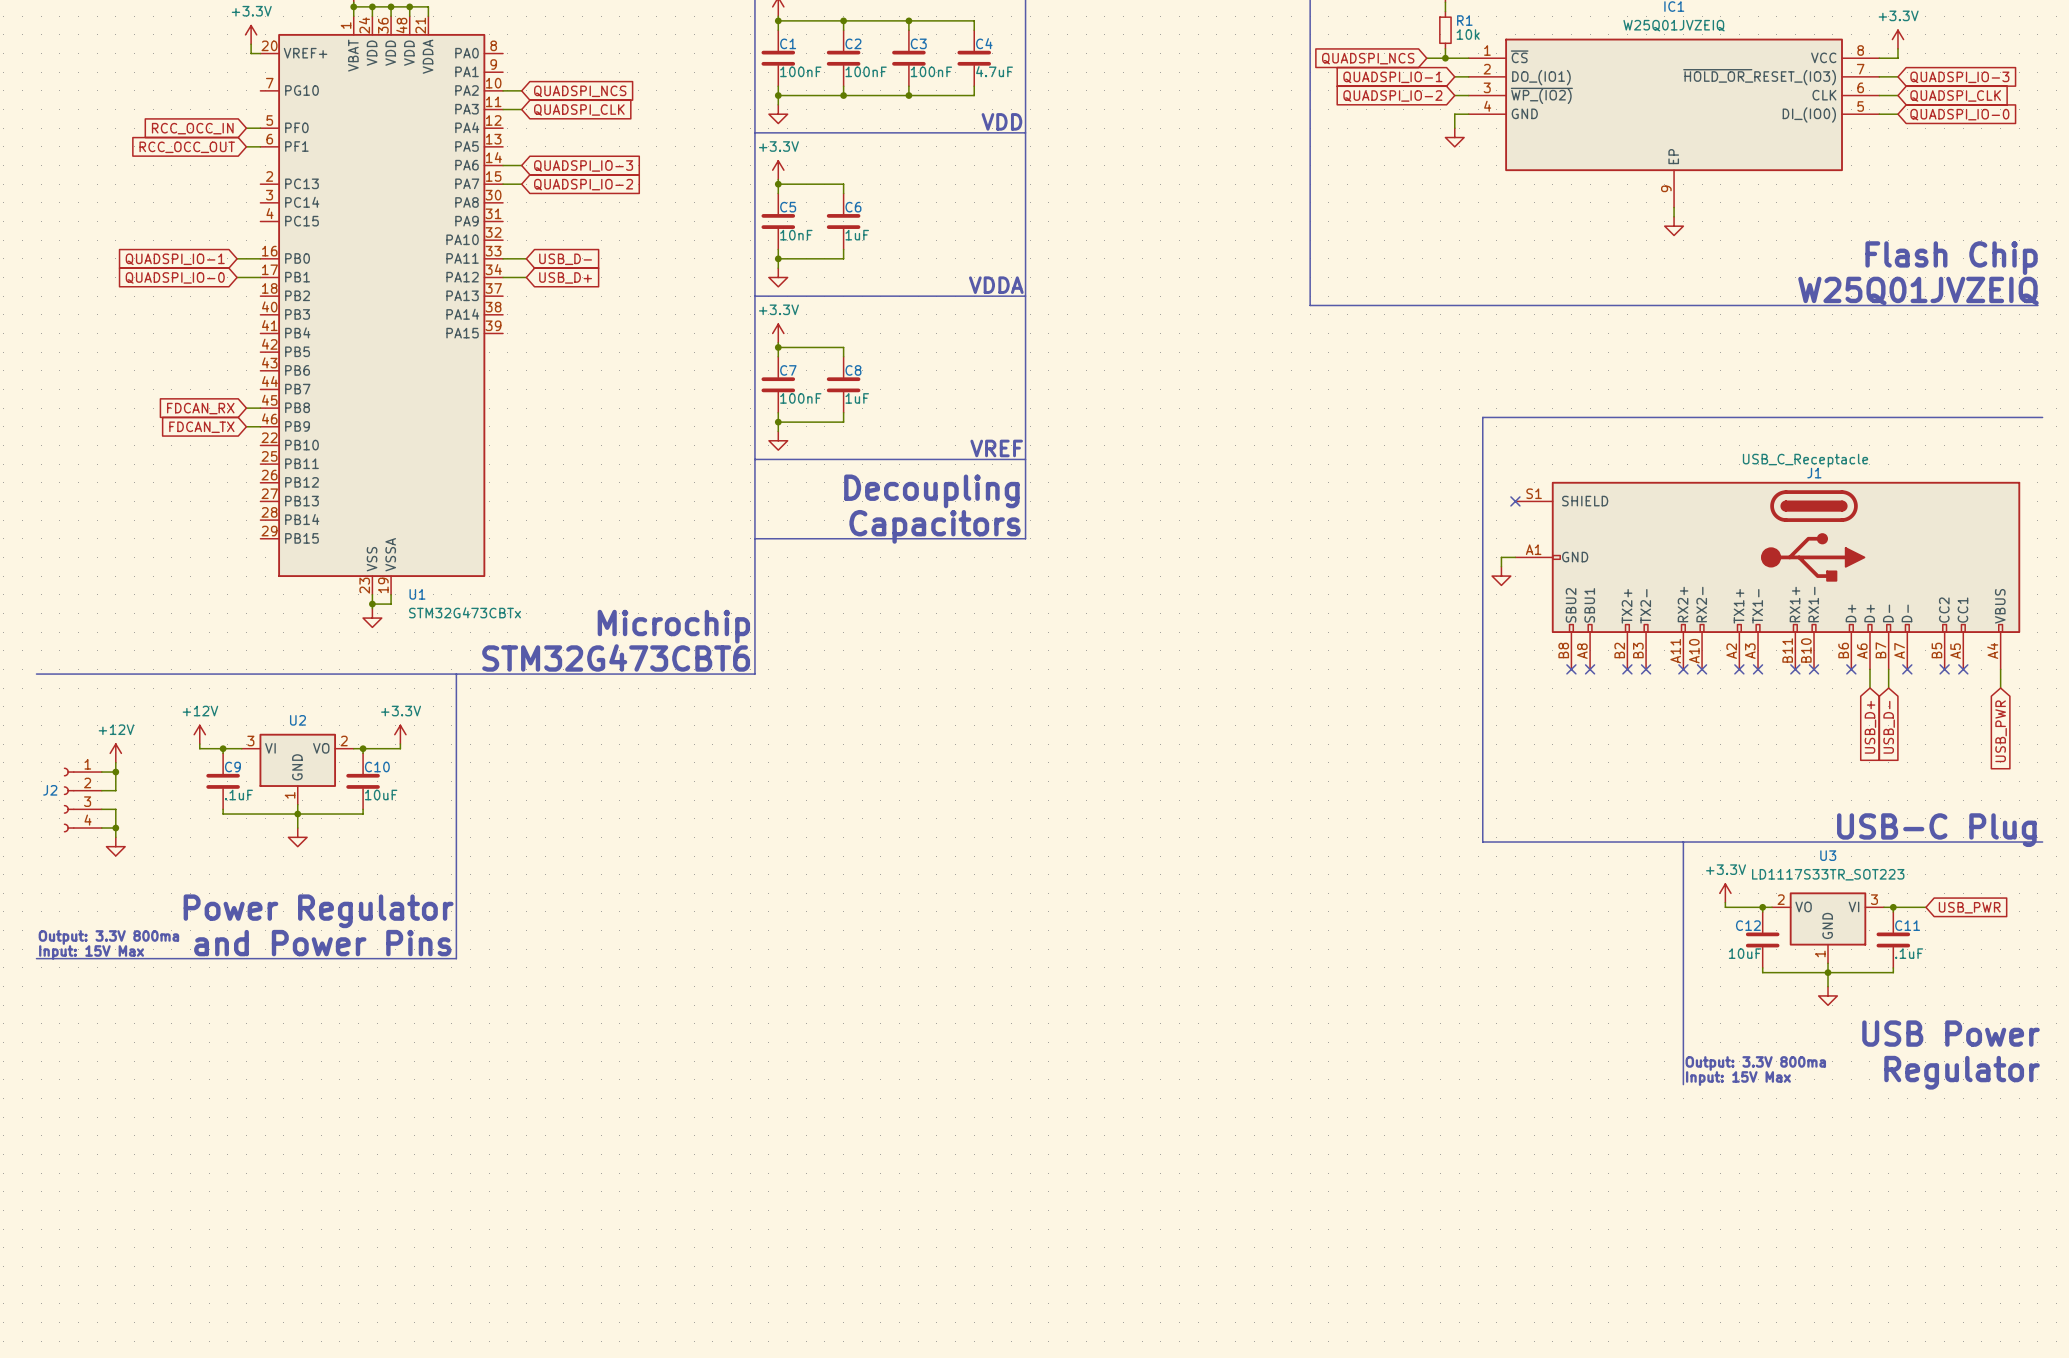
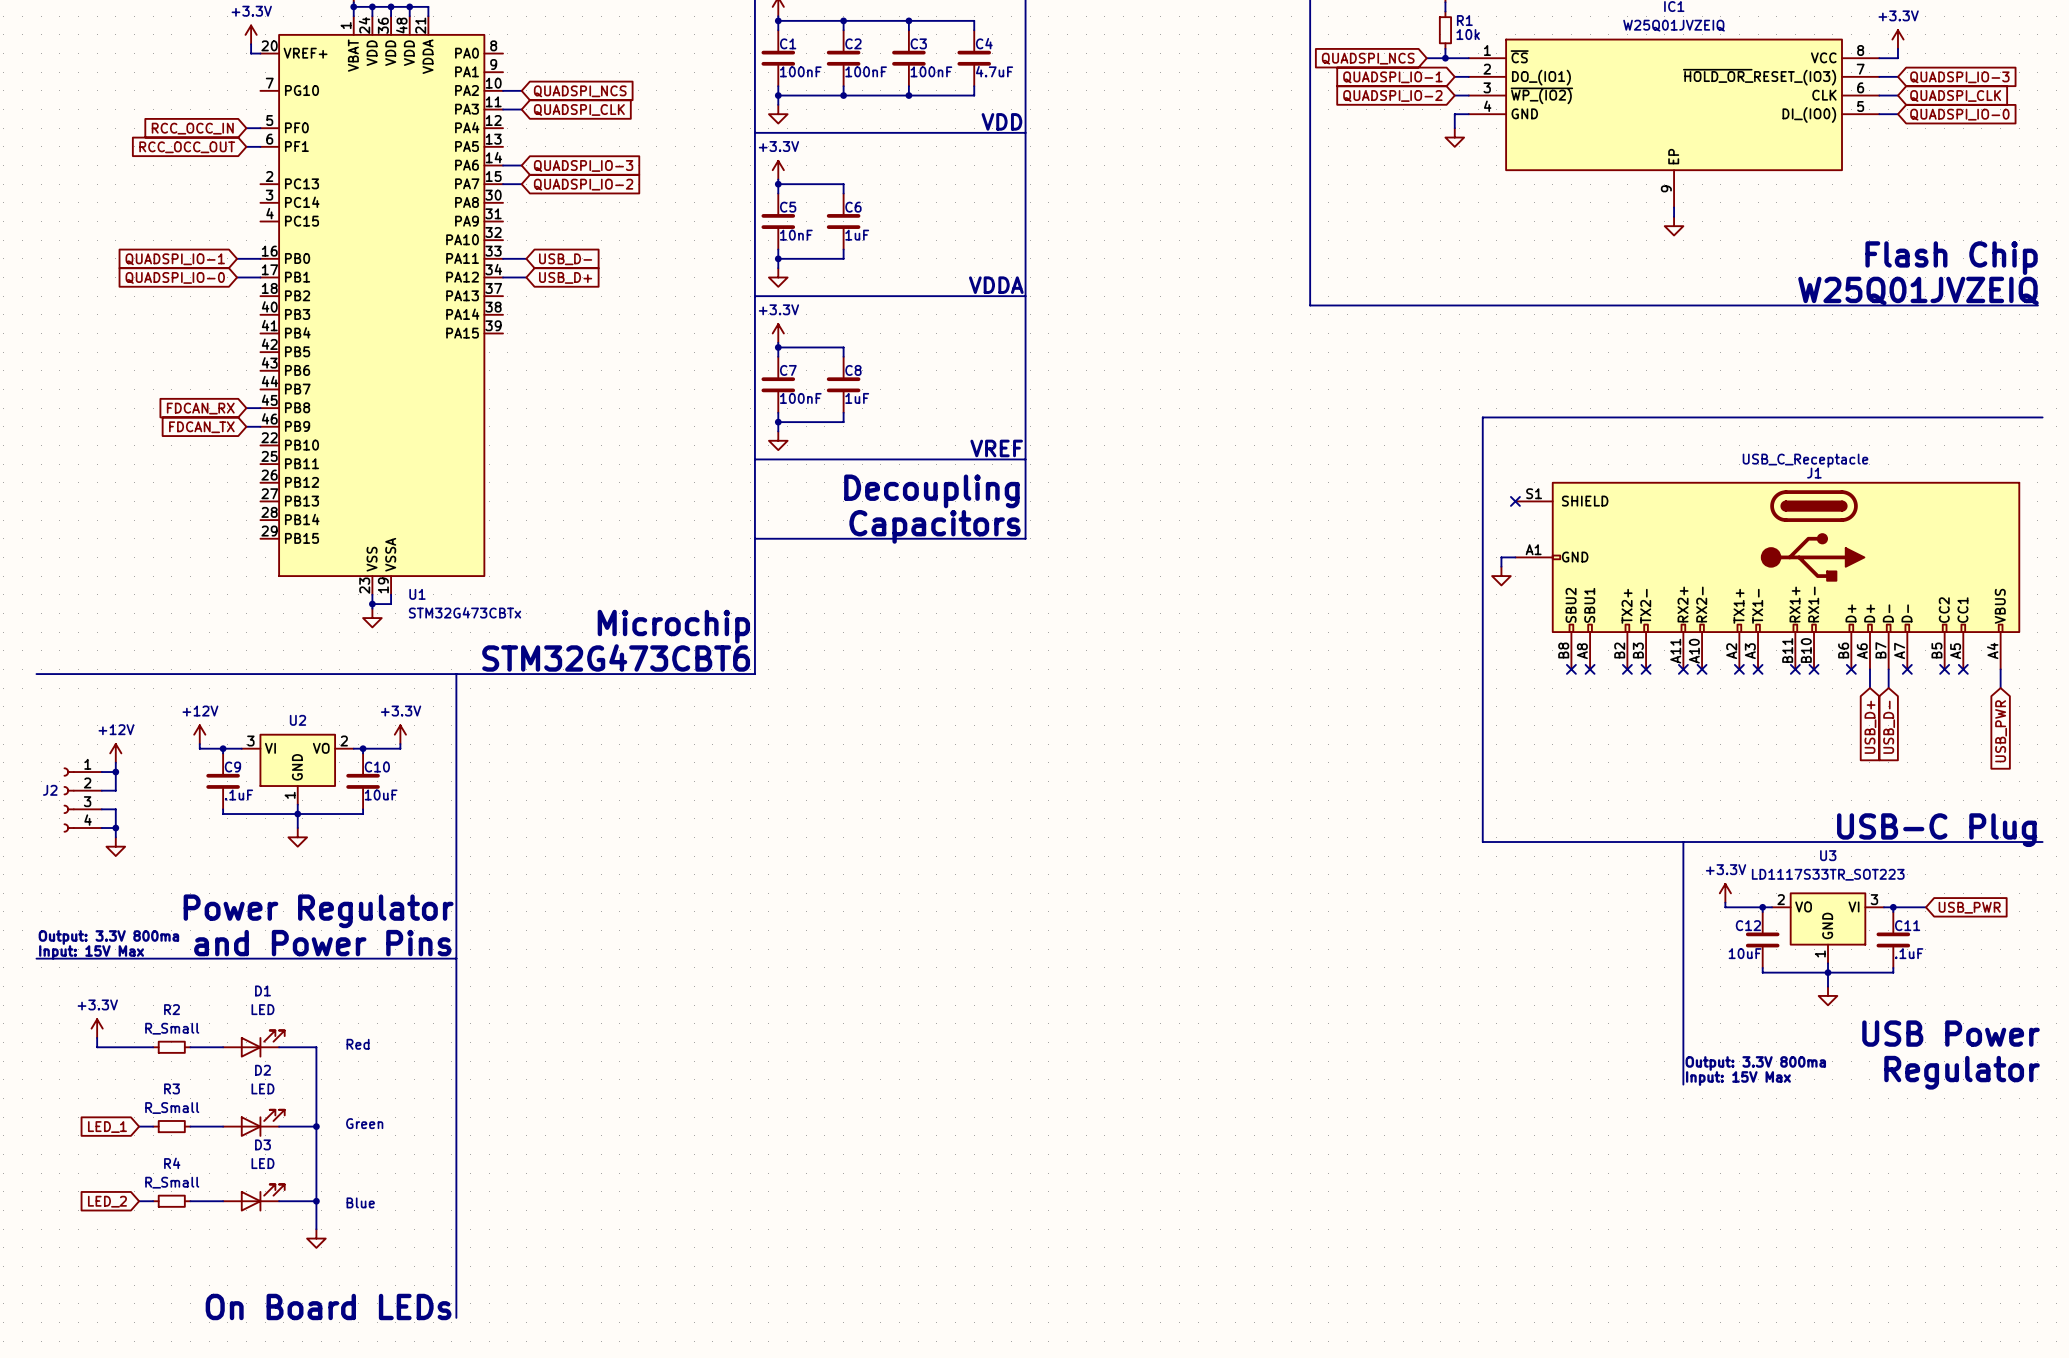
line: none -> (456, 958) (456, 1317)
power symbol: none -> +3.3V (97, 1028)
wire: none -> (97, 1037) (97, 1047) (153, 1047)
D1: none -> LED (253, 1044)
text: none -> Red (358, 1044)
R2: none -> R_Small (171, 1047)
wire: none -> (190, 1047) (223, 1047)
wire: none -> (279, 1047) (316, 1047) (316, 1229)
D2: none -> LED (253, 1123)
text: none -> Green (364, 1123)
wire: none -> (139, 1126) (153, 1126)
R3: none -> R_Small (171, 1126)
wire: none -> (190, 1126) (223, 1126)
wire: none -> (279, 1126) (316, 1126)
junction: none -> (316, 1126)
global label: none -> LED_1 (107, 1127)
D3: none -> LED (253, 1197)
global label: none -> LED_2 (107, 1201)
wire: none -> (139, 1201) (153, 1201)
R4: none -> R_Small (171, 1201)
wire: none -> (190, 1201) (223, 1201)
wire: none -> (279, 1201) (316, 1201)
junction: none -> (316, 1201)
text: none -> Blue (360, 1202)
power symbol: none -> (316, 1238)
text: none -> On Board LEDs (328, 1306)

